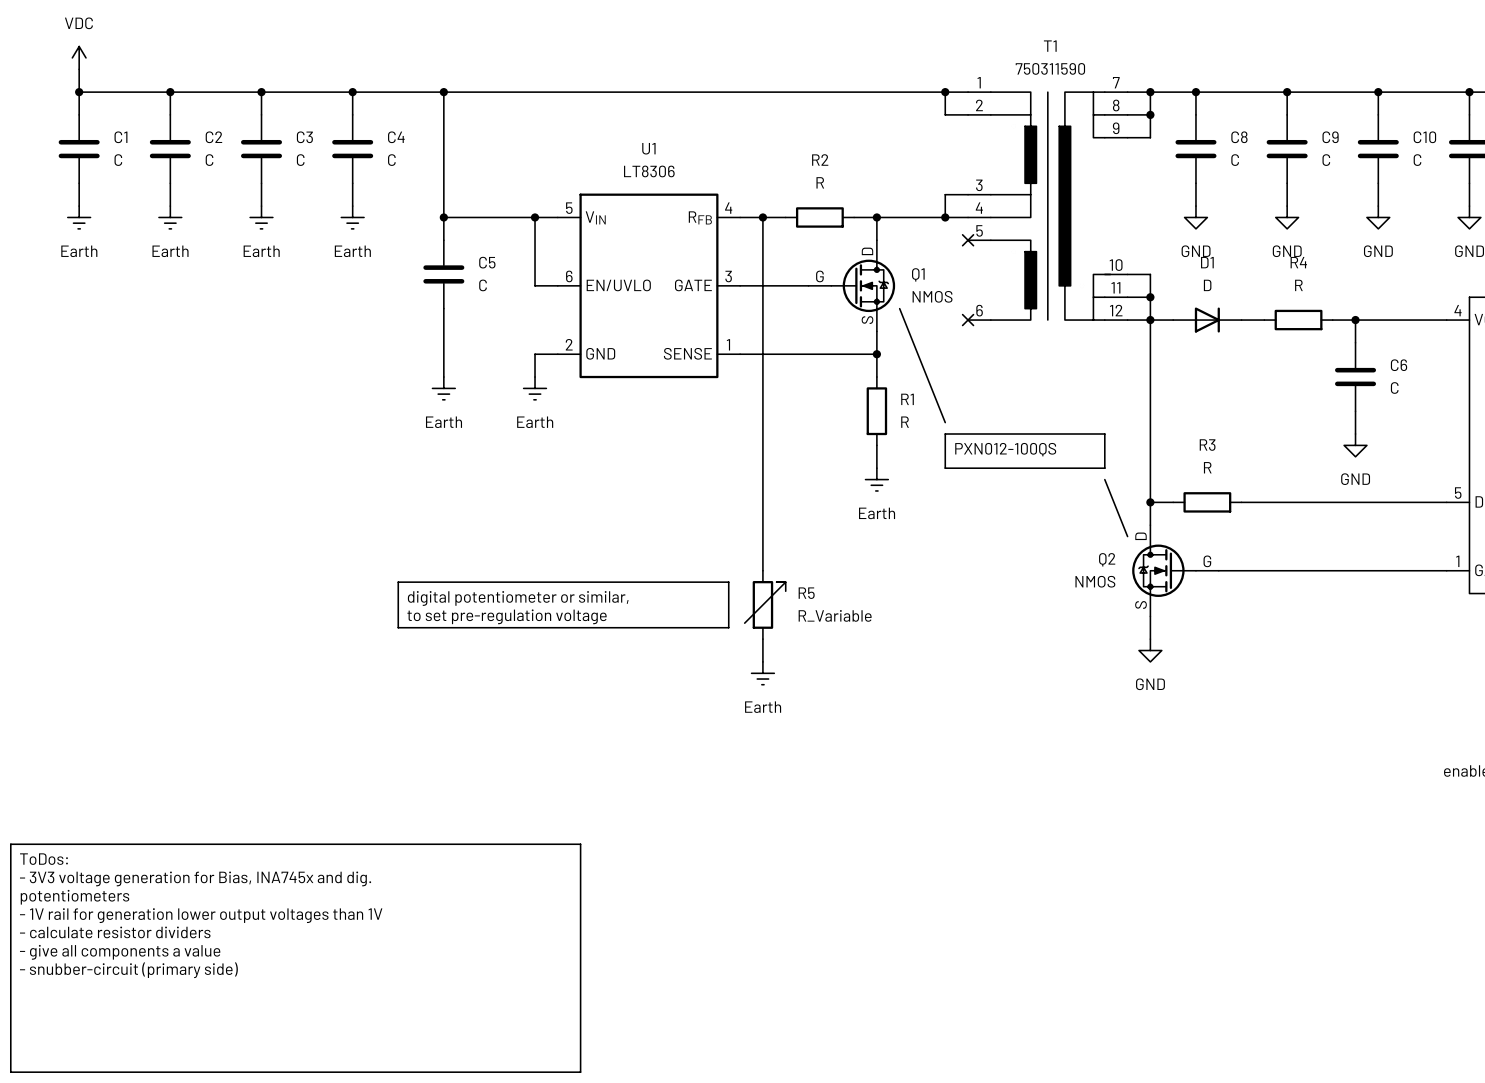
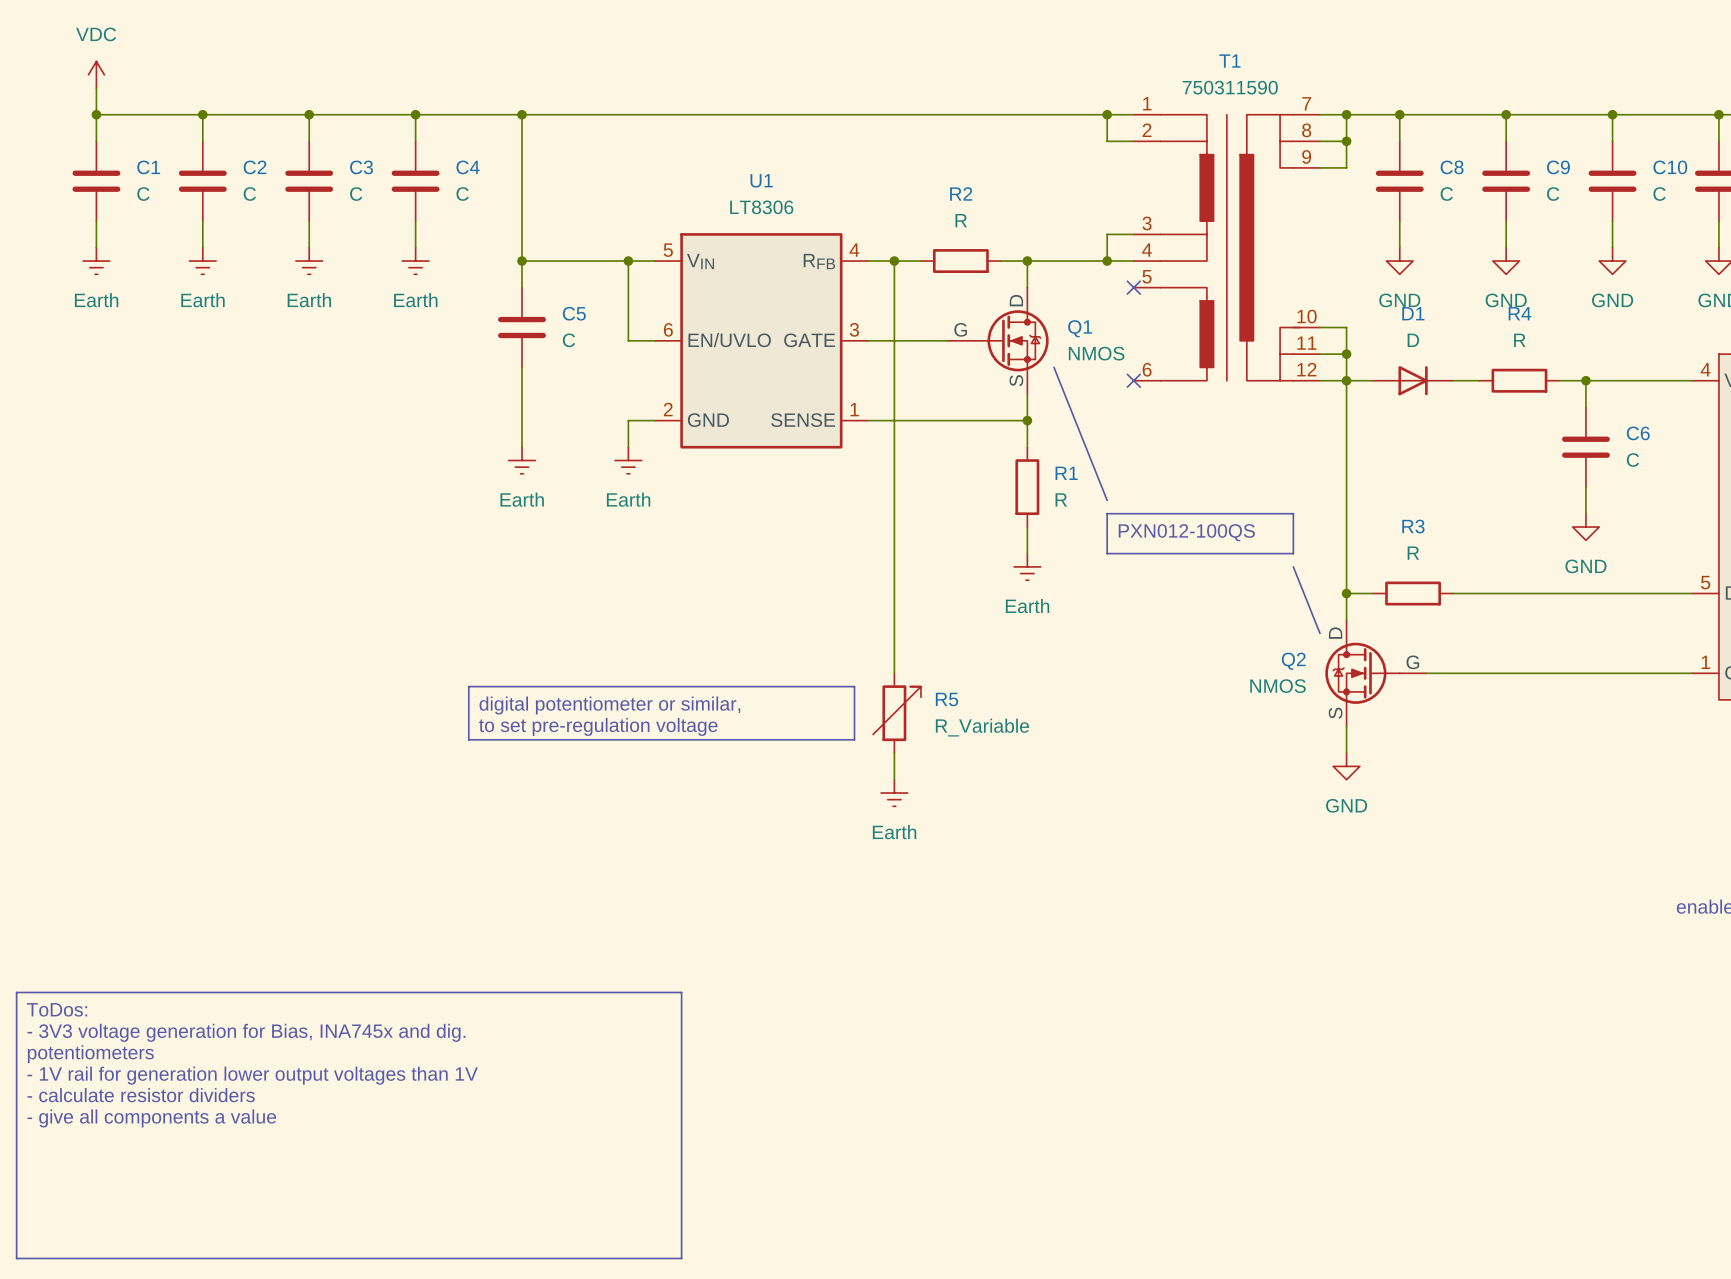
text: - snubber-circuit (primary side) (128, 970) -> none

